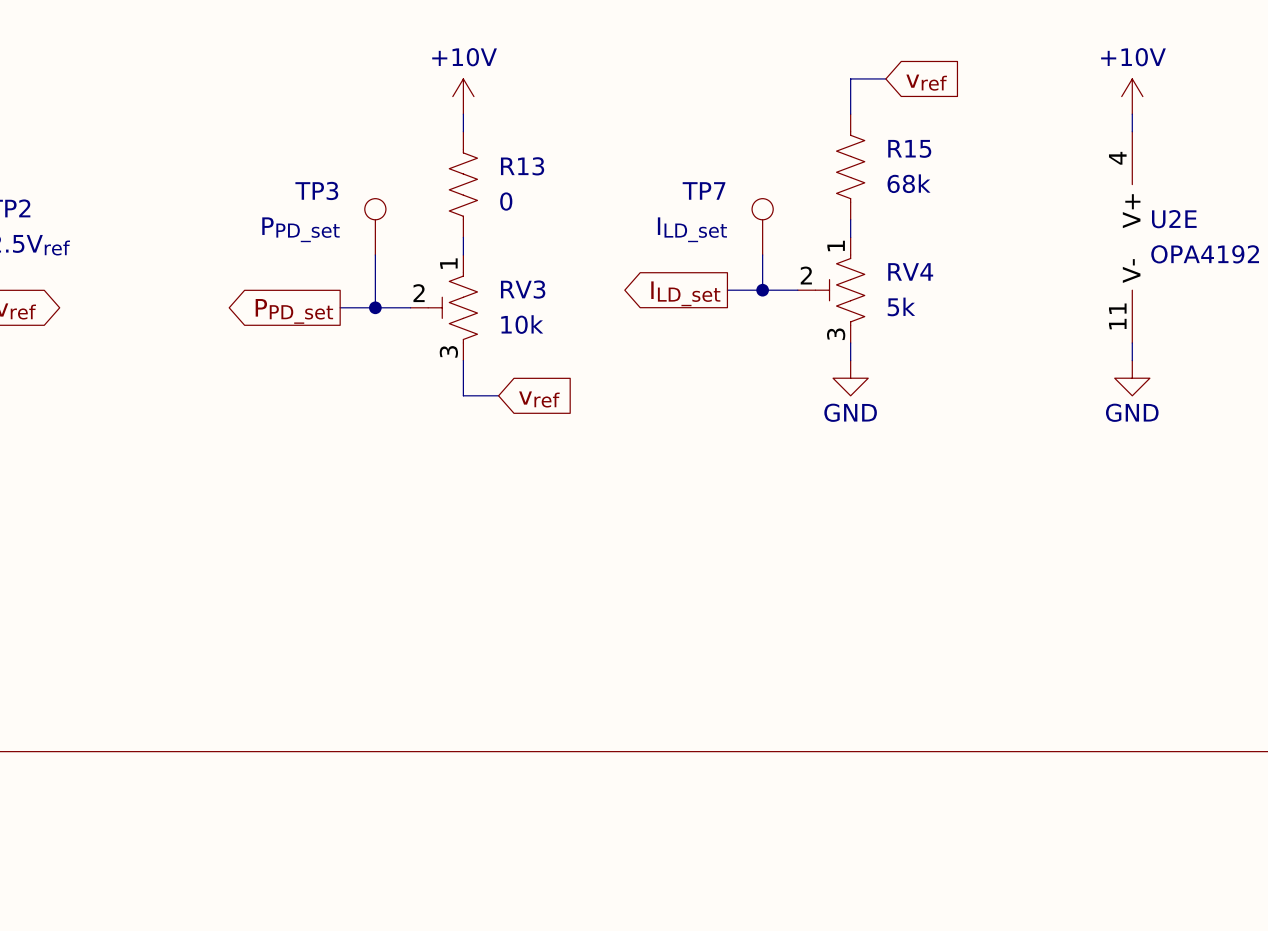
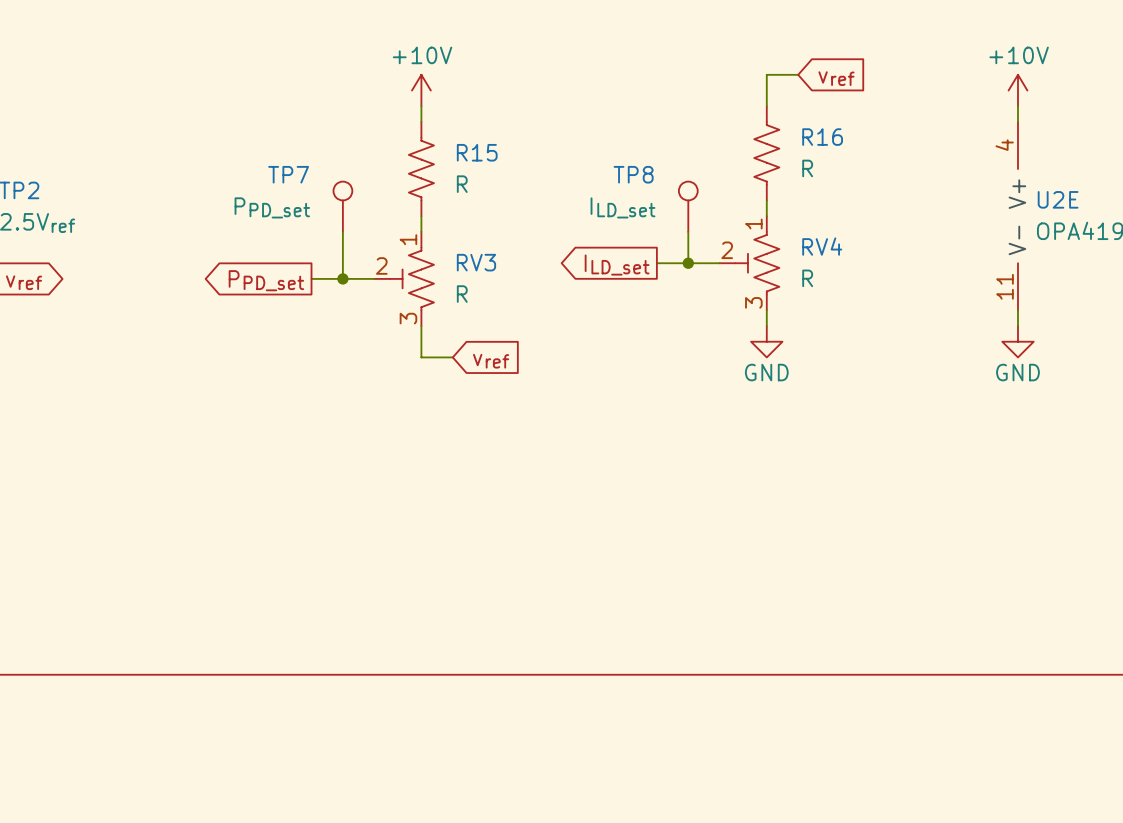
R15 name: R15 (909, 148) -> R16 (822, 137)
R13 name: R13 (522, 166) -> R15 (477, 152)
R15 value: 68k (909, 183) -> R (807, 168)
TP3 name: TP3 (316, 190) -> TP7 (288, 174)
TP7 name: TP7 (704, 190) -> TP8 (633, 174)
R13 value: 0 (506, 201) -> R (462, 184)
RV4 value: 5k (901, 306) -> R (807, 278)
RV3 value: 10k (522, 324) -> R (462, 294)

